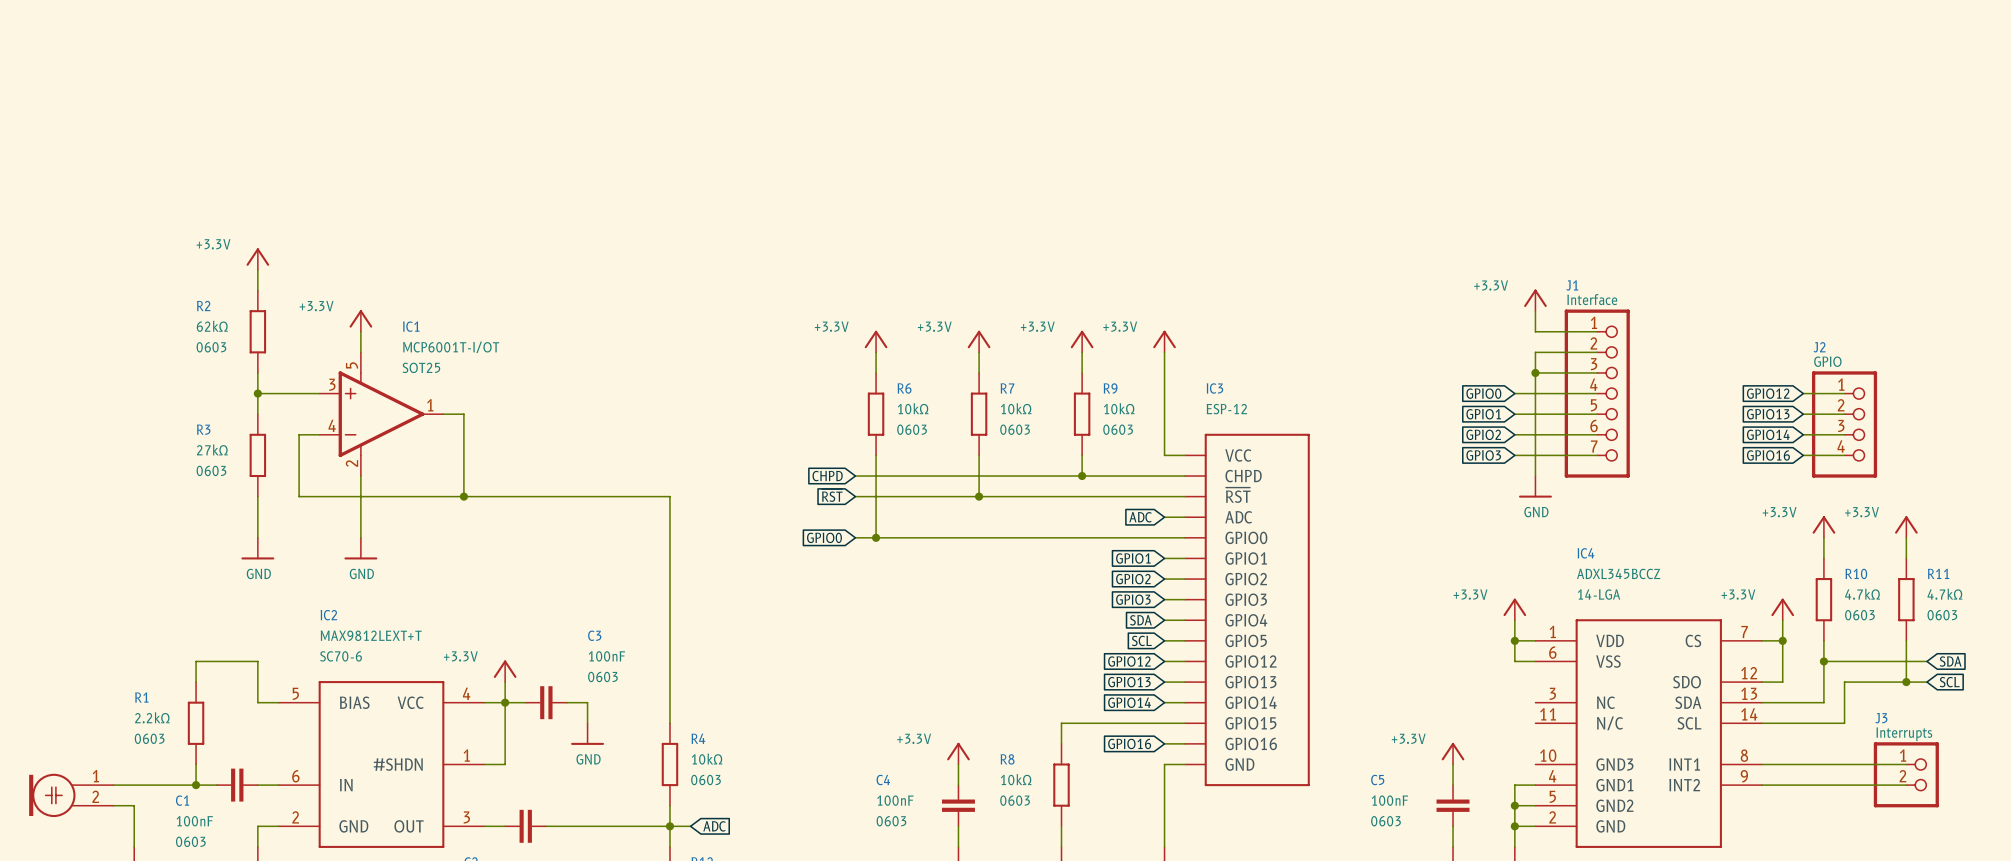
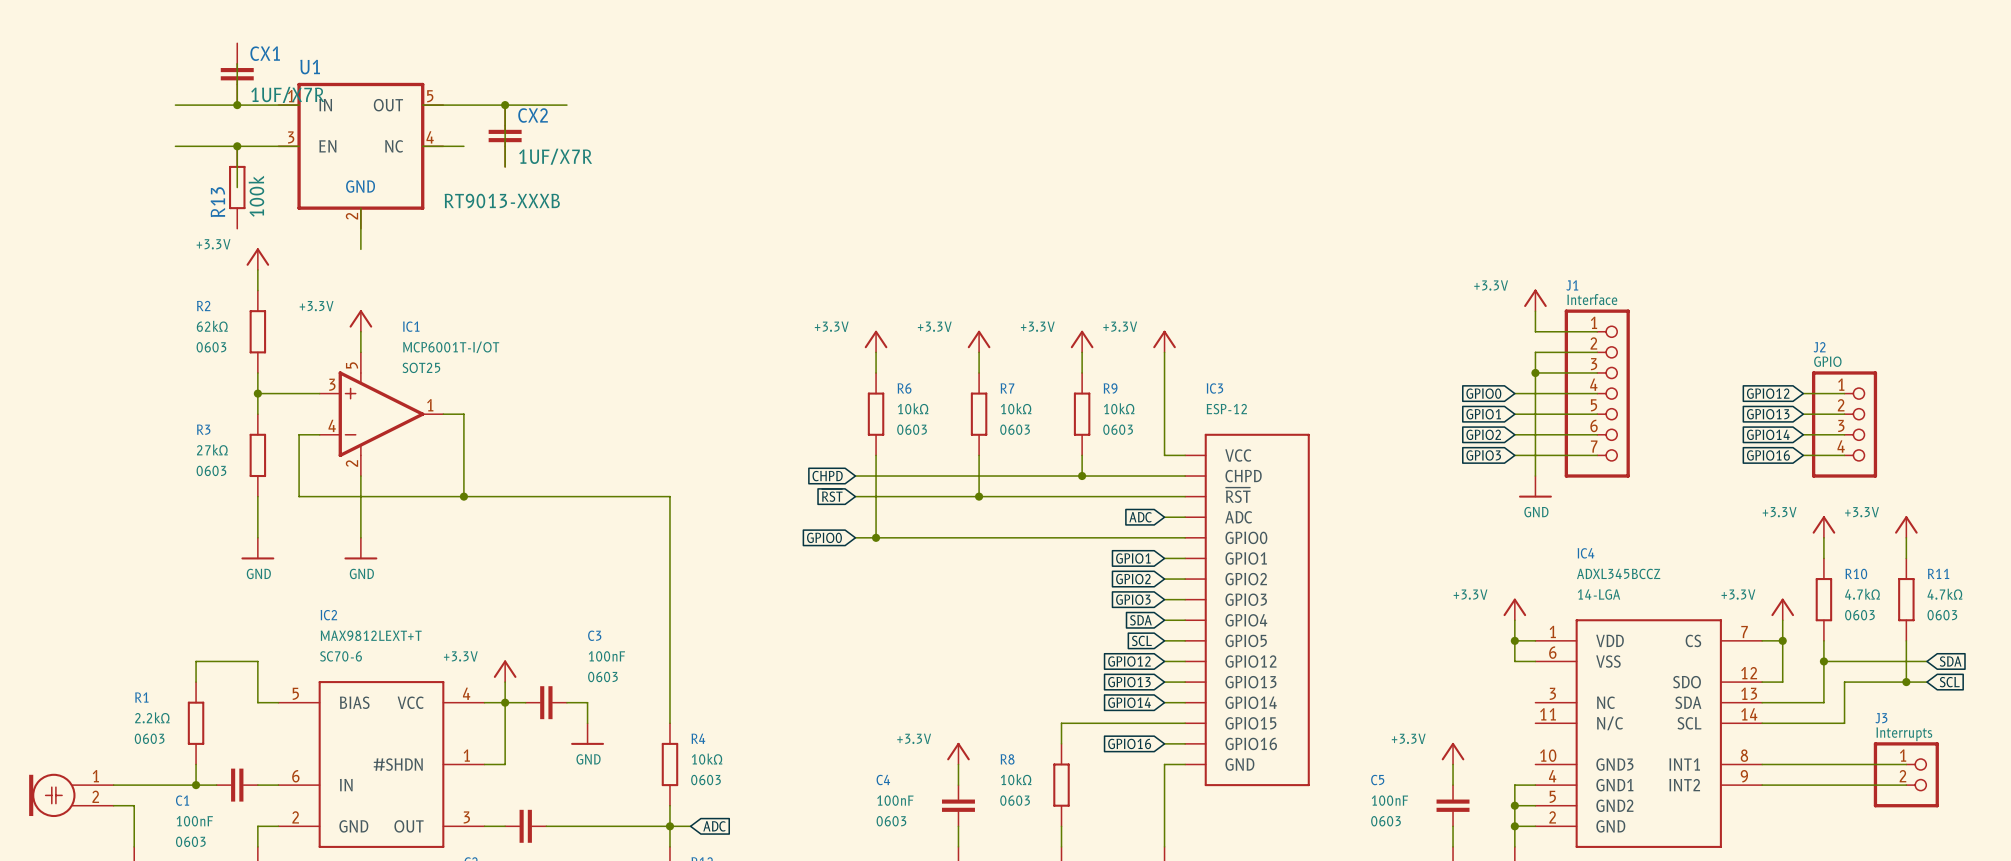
wire: none -> (237, 63) (237, 105)
CX1: none -> 1UF/X7R (237, 74)
wire: none -> (175, 105) (299, 105)
junction: none -> (237, 105)
wire: none -> (422, 105) (566, 105)
wire: none -> (505, 105) (505, 166)
junction: none -> (505, 105)
CX2: none -> 1UF/X7R (505, 136)
wire: none -> (175, 146) (299, 146)
wire: none -> (237, 146) (237, 187)
junction: none -> (237, 146)
wire: none -> (422, 146) (463, 146)
U1: none -> RT9013-XXXB (360, 155)
R13: none -> 100k (237, 187)
wire: none -> (360, 208) (360, 249)

